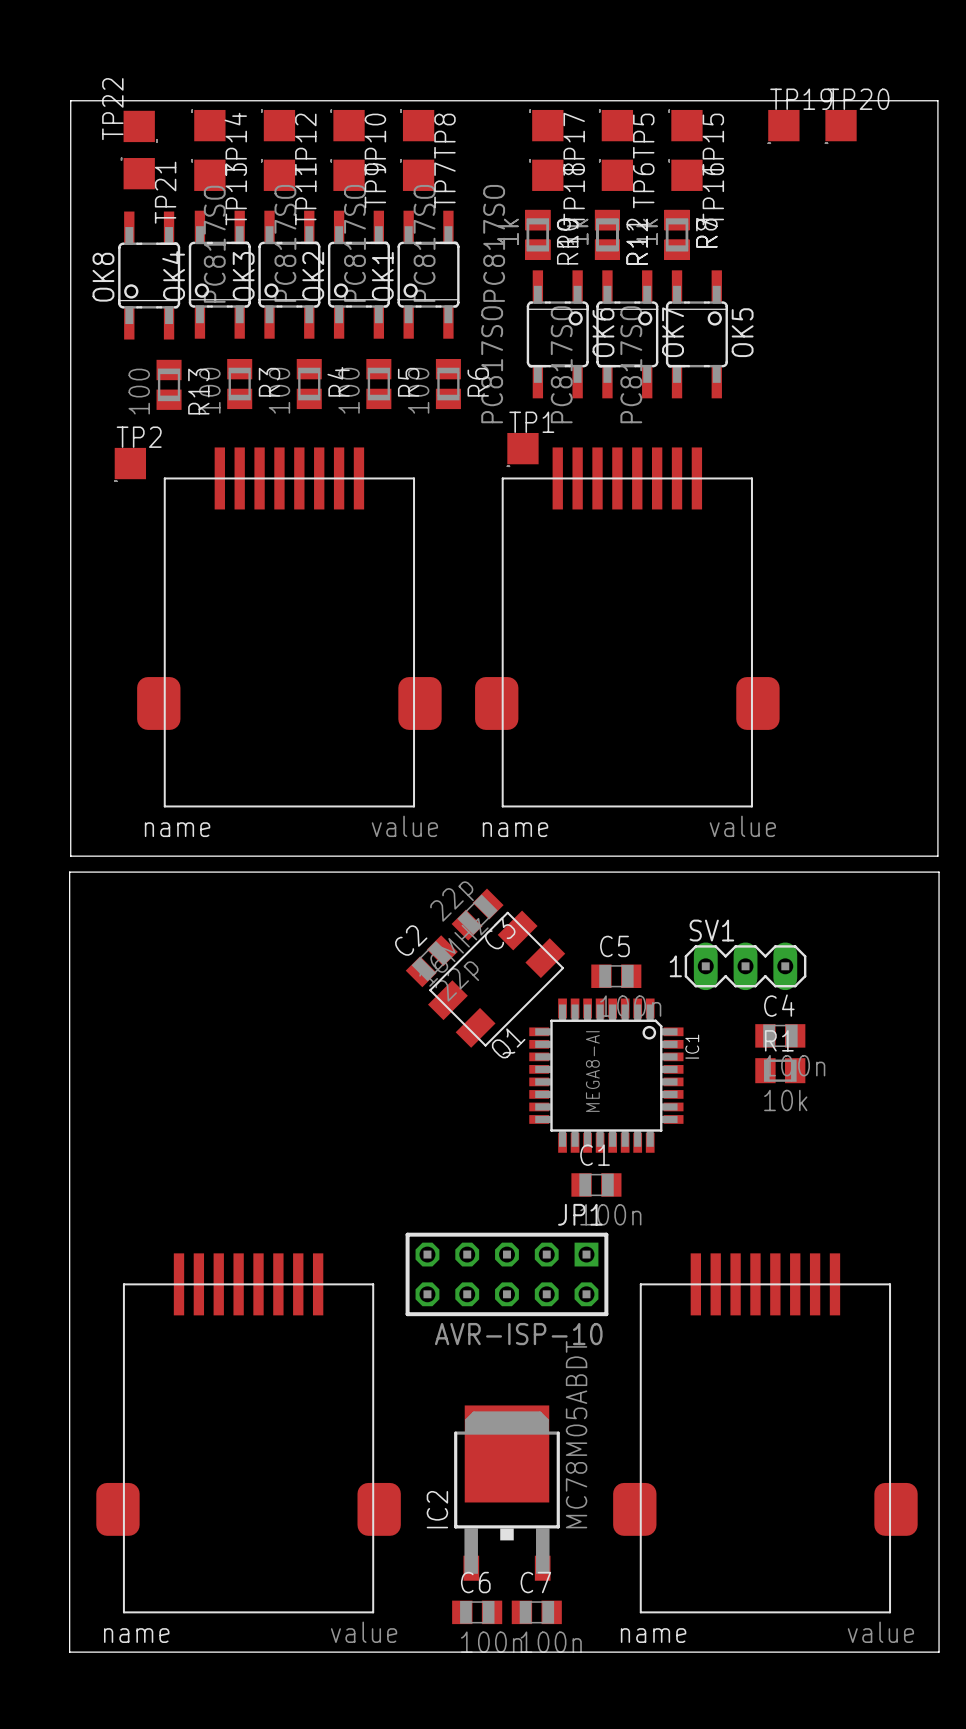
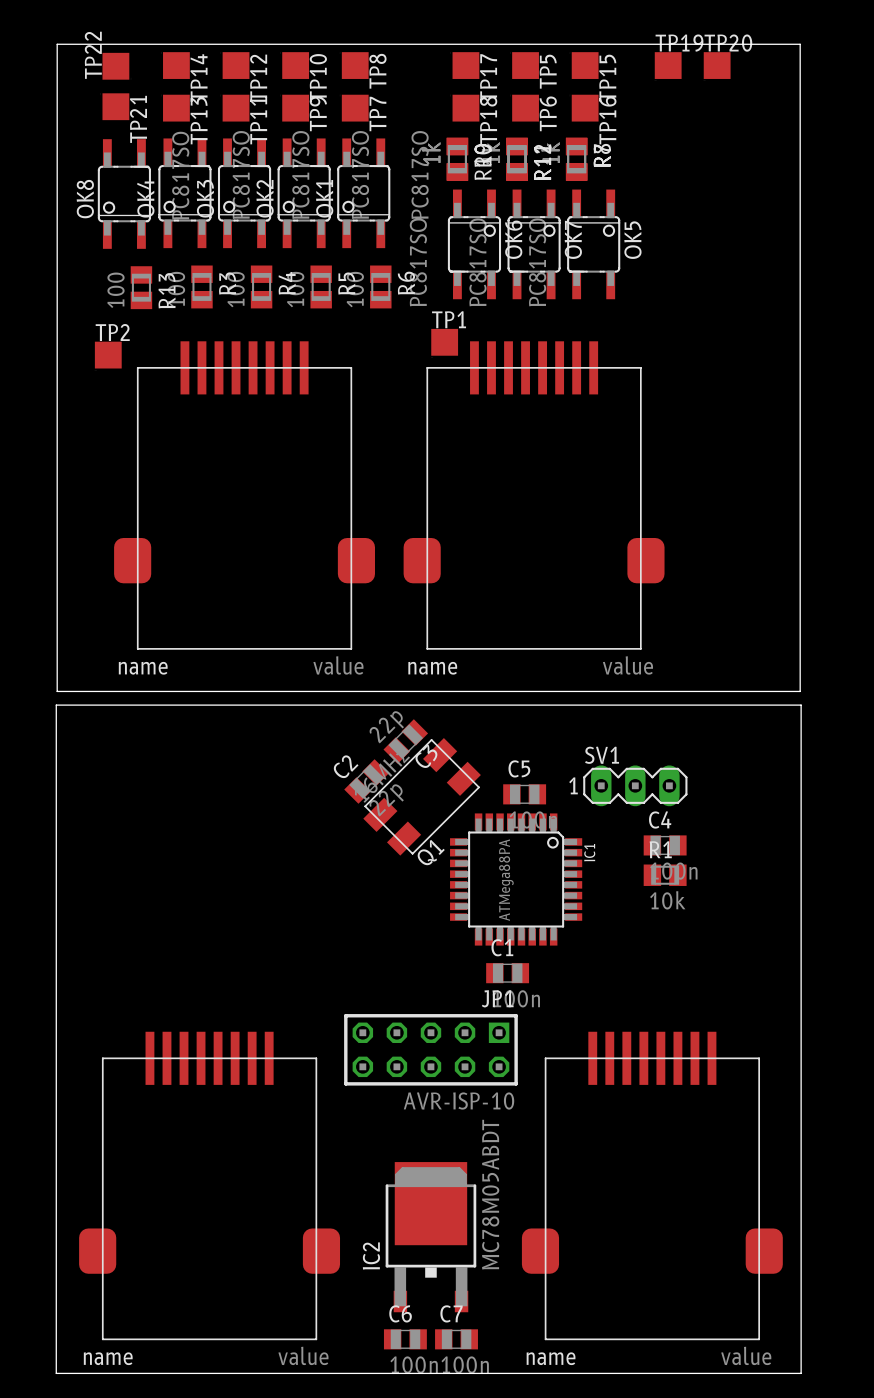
IC1 value: MEGA8-AI (592, 1071) -> ATMega88PA (506, 880)

